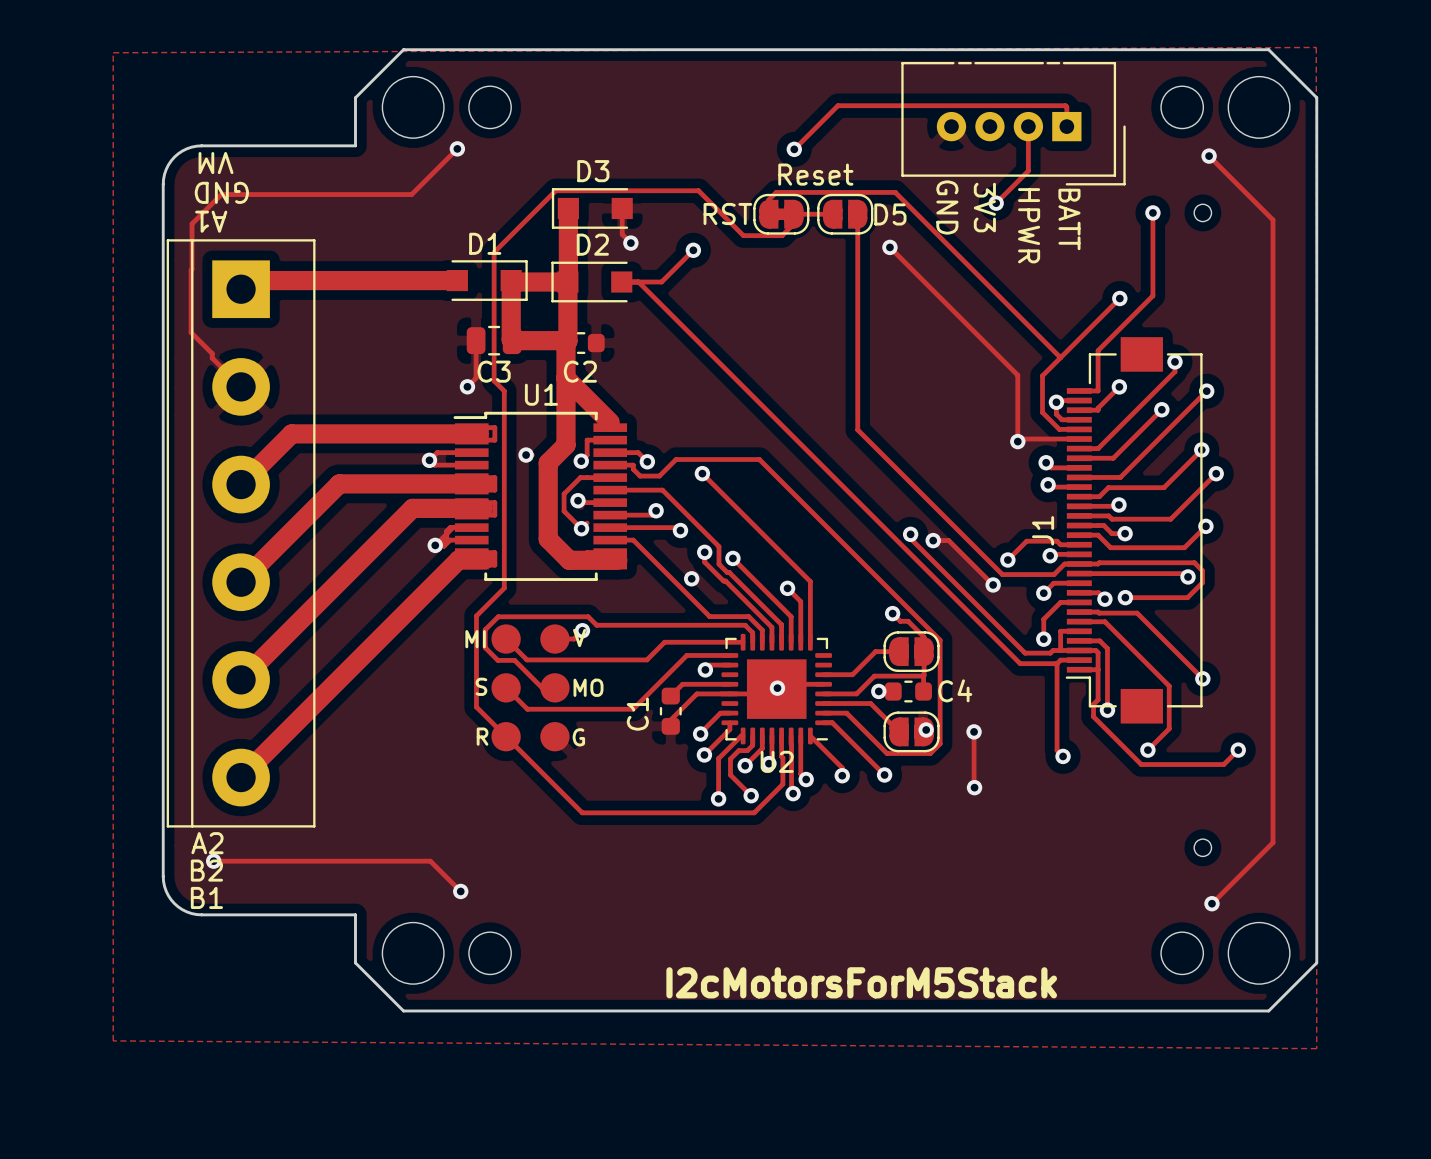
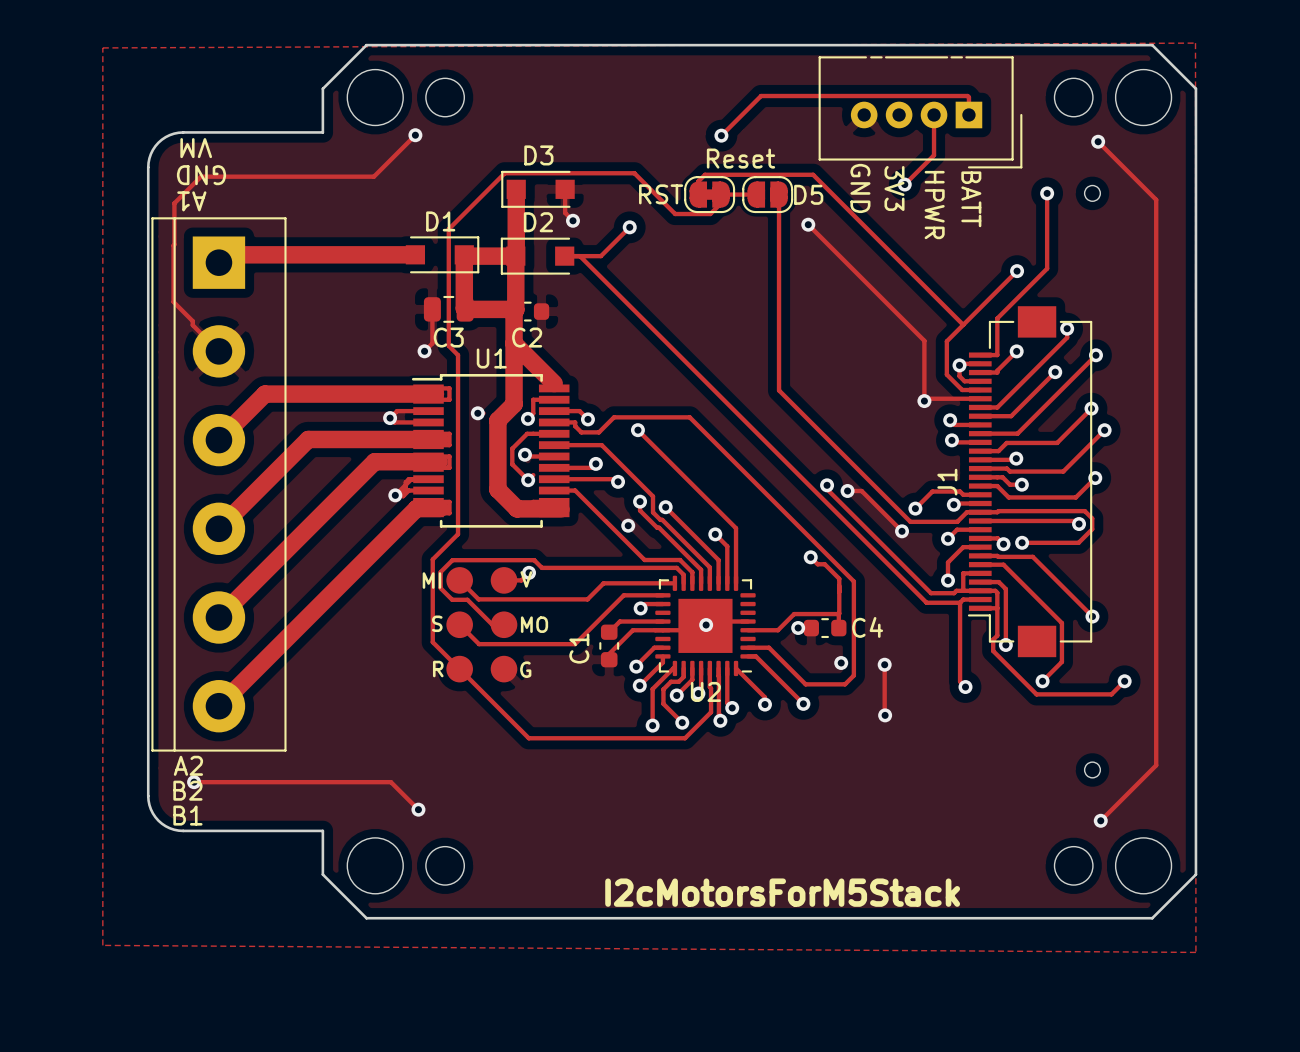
track: (899, 651) (875, 651) (852, 674) (823, 674) -> none
part: (911, 651) -> none
track: (823, 703) (870, 703) (899, 731) -> none
part: (911, 731) -> none

